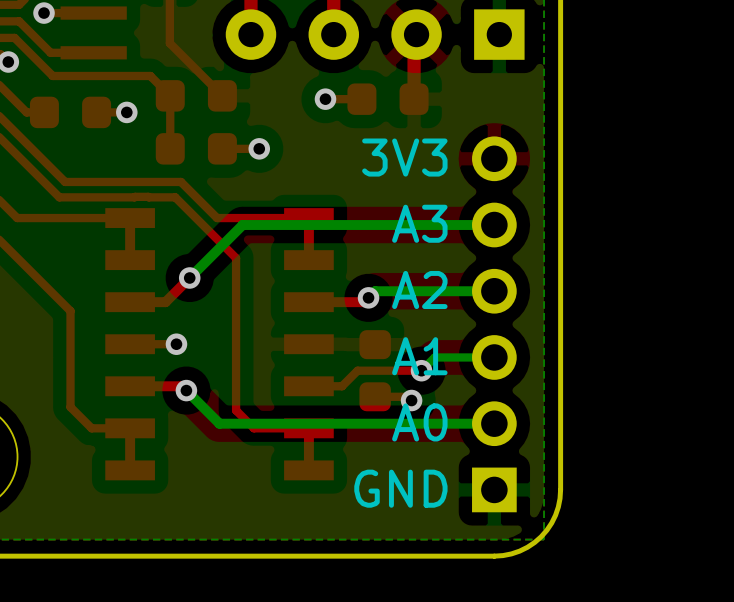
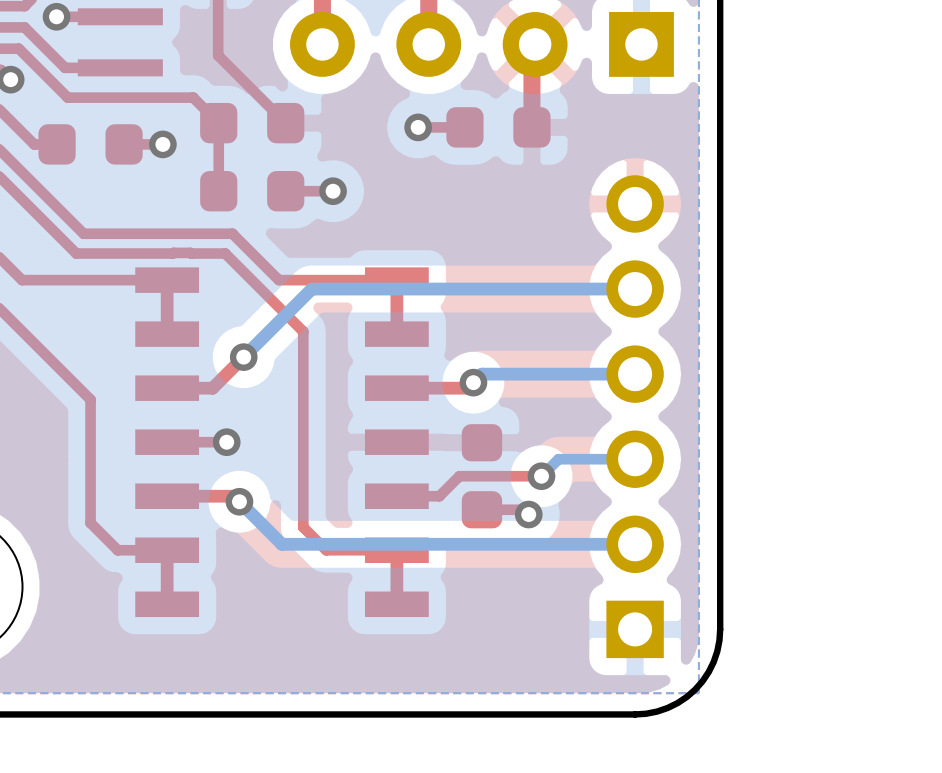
text: 3V3 (404, 157) -> none
text: A3 (419, 223) -> none
text: A2 (419, 290) -> none
text: A1 (419, 356) -> none
text: A0 (419, 422) -> none
text: GND (400, 488) -> none

